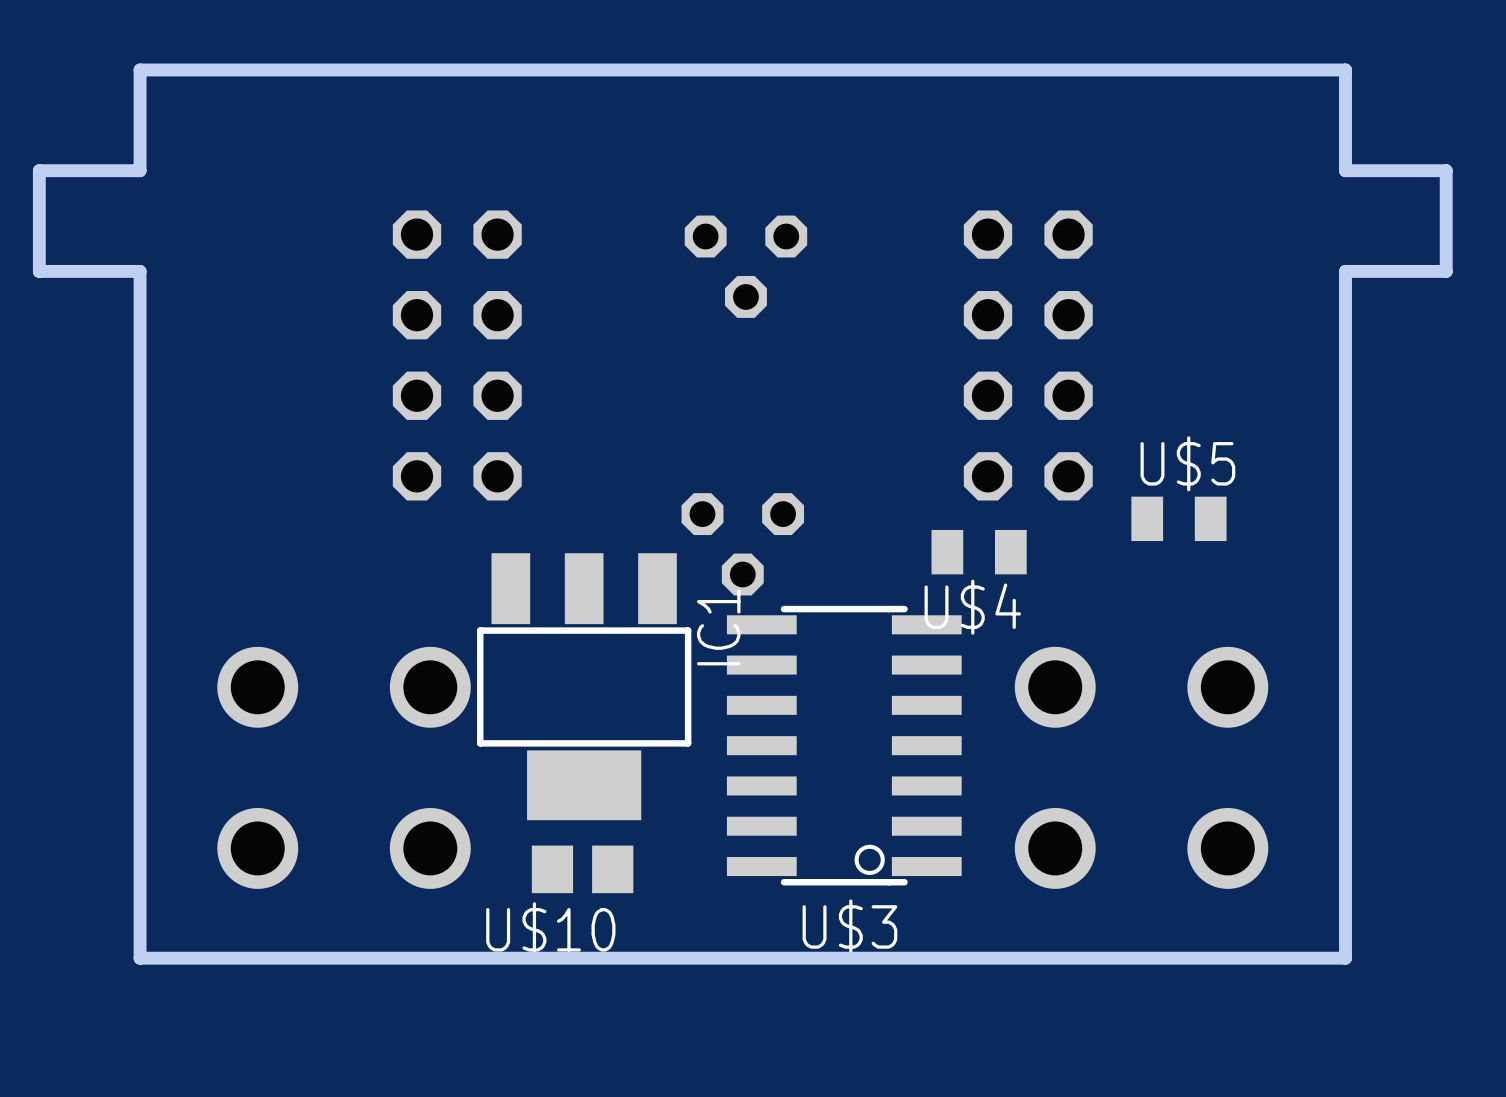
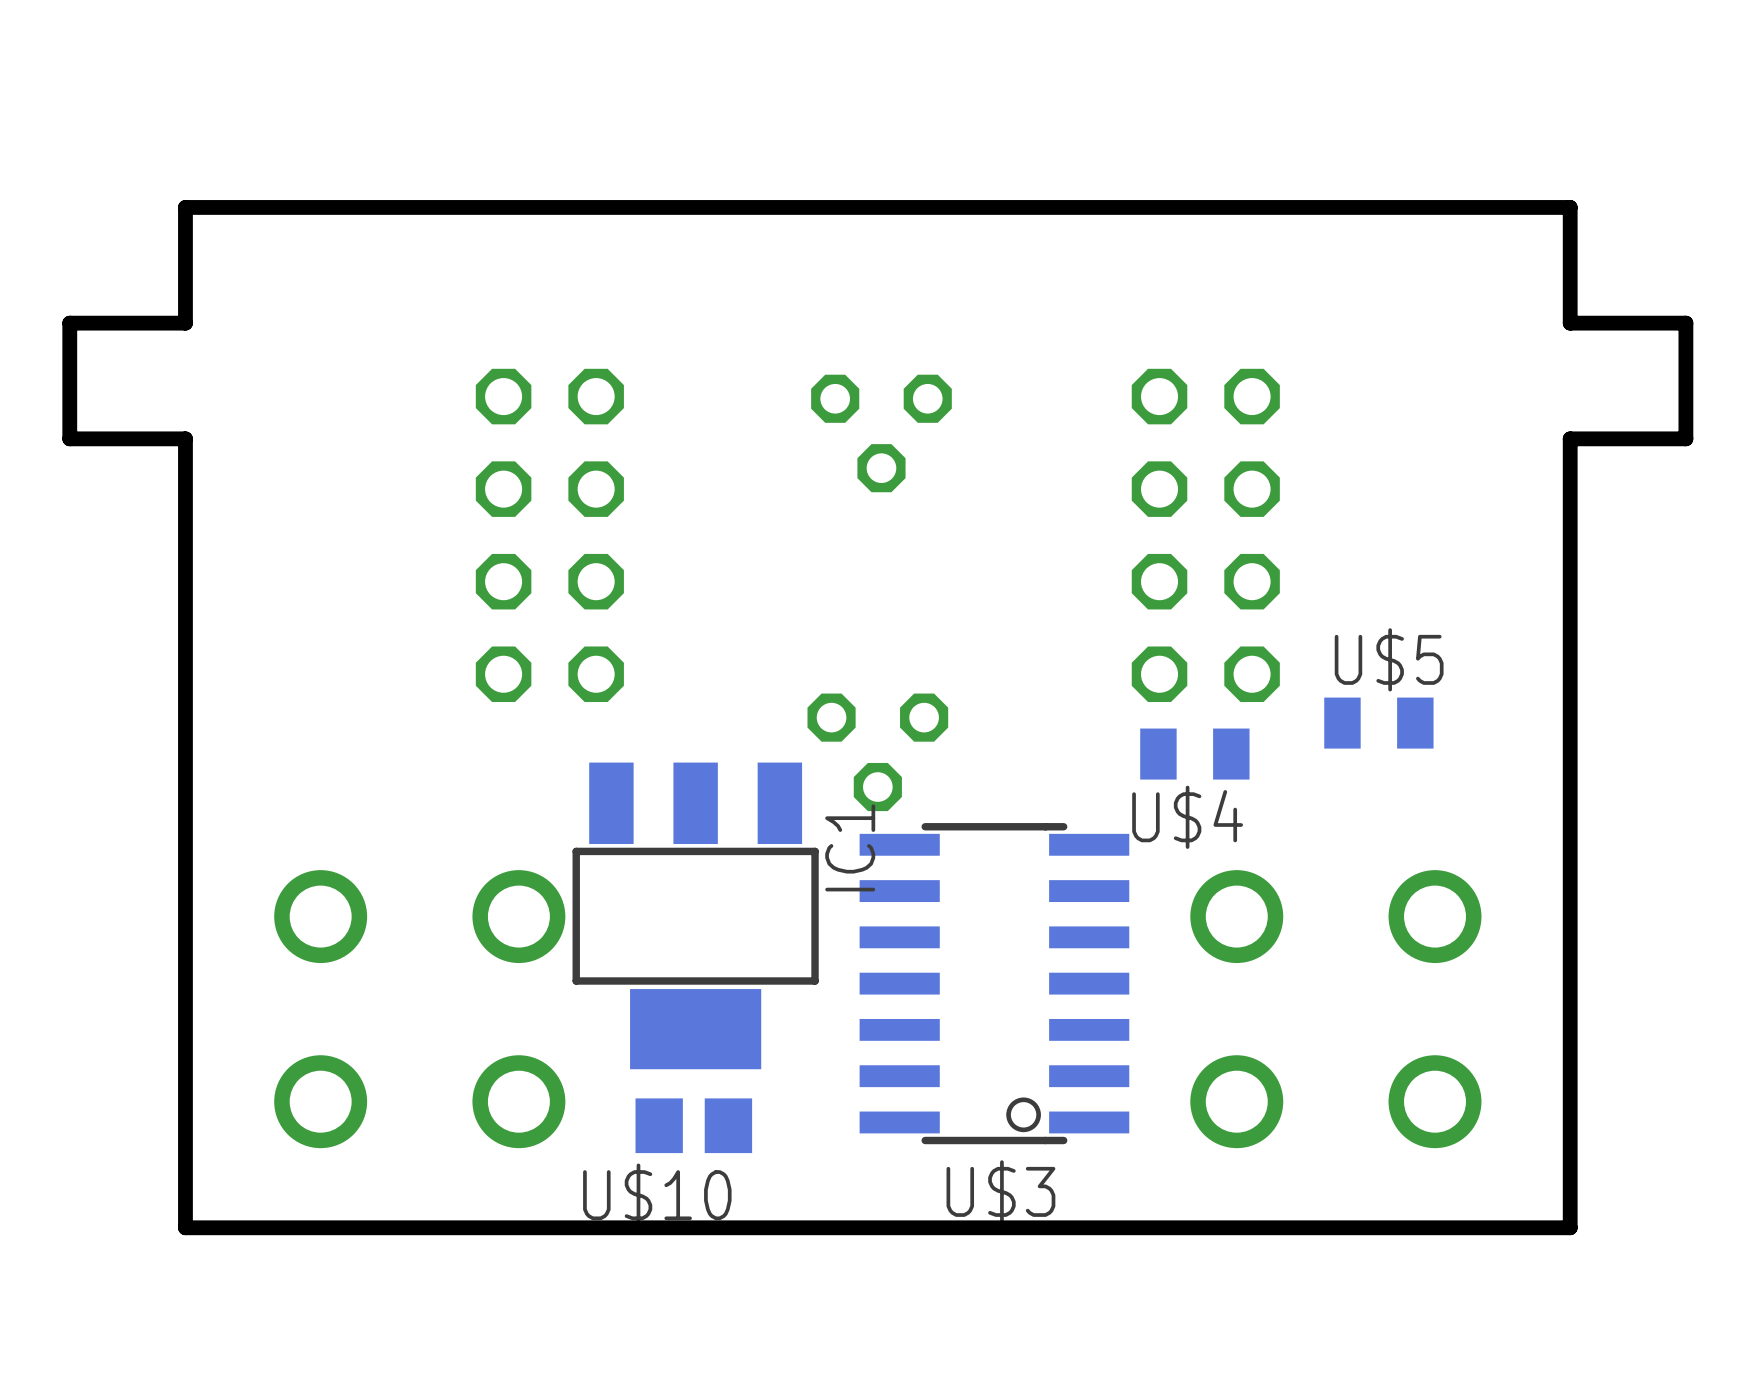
U$4 position: (979, 552) -> (1194, 754)

